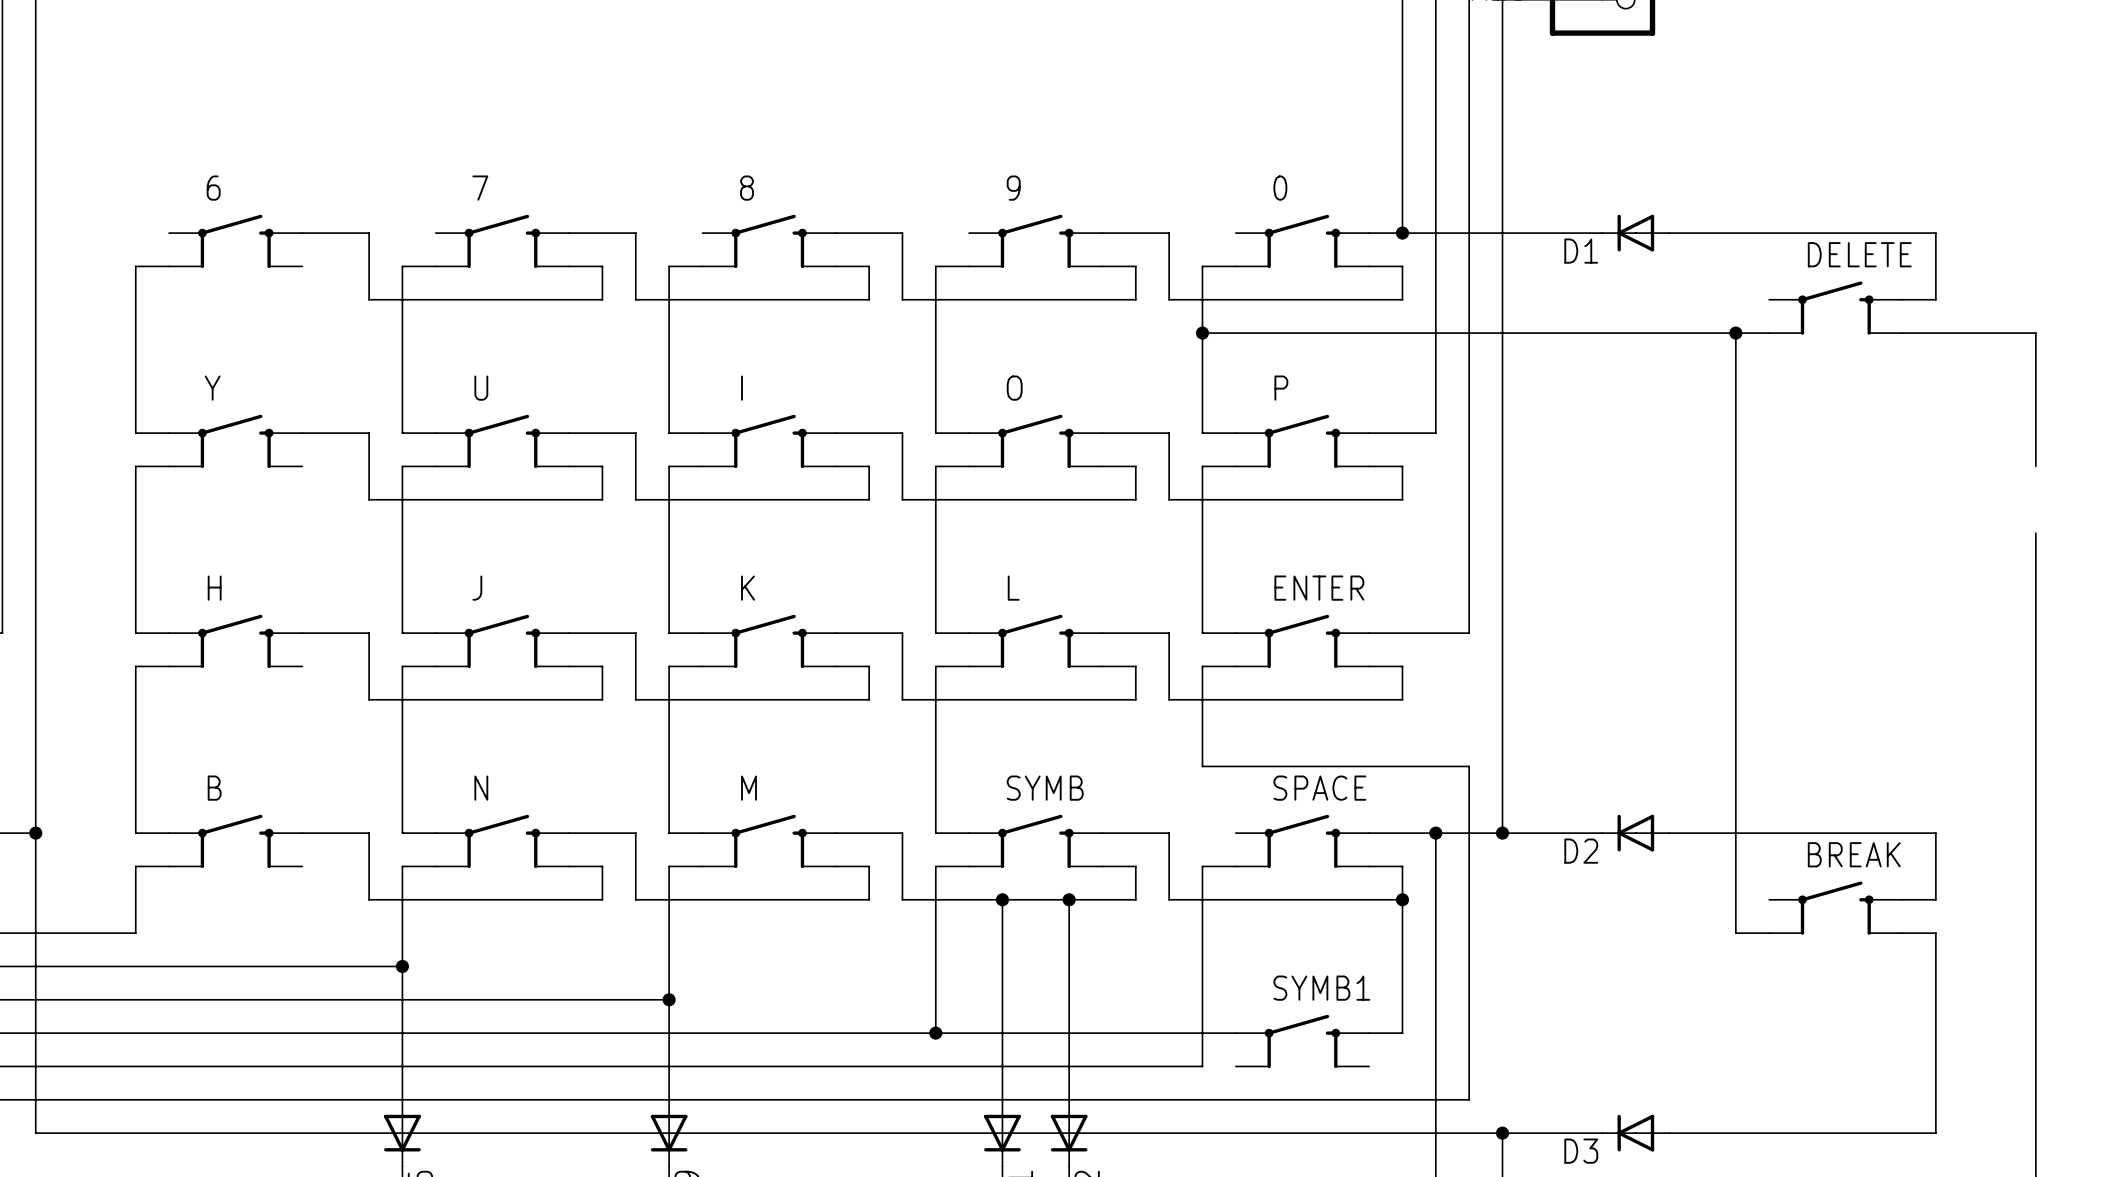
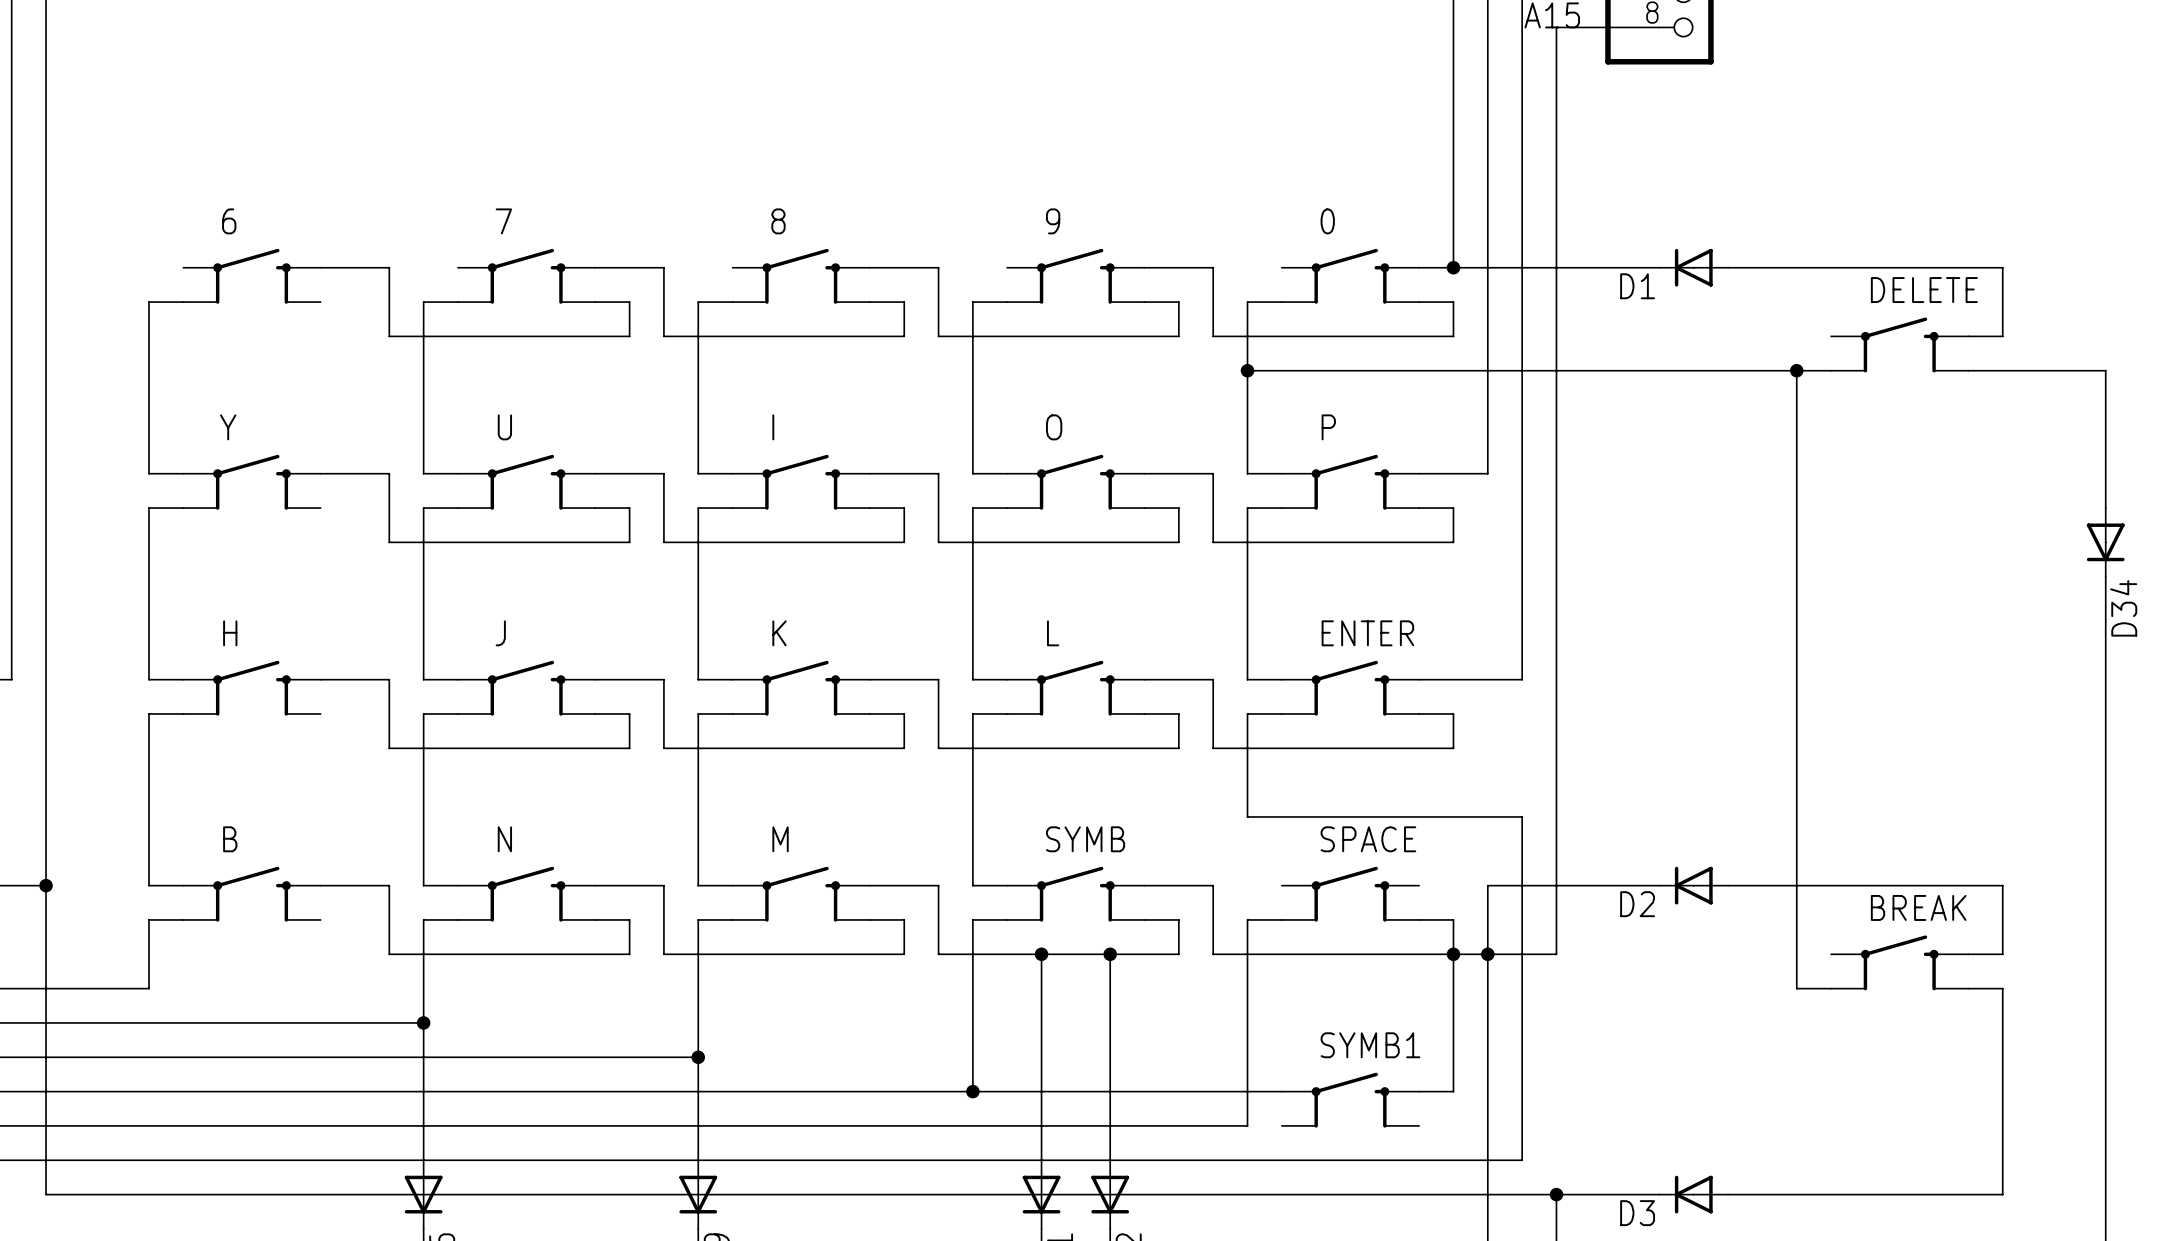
D34: none -> (2105, 542)
wire: (1369, 833) (1435, 833) -> none
junction: (1435, 833) -> none
wire: none -> (1556, 885) (1556, 954) (1453, 954)
junction: (1502, 833) -> none
junction: none -> (1487, 954)

